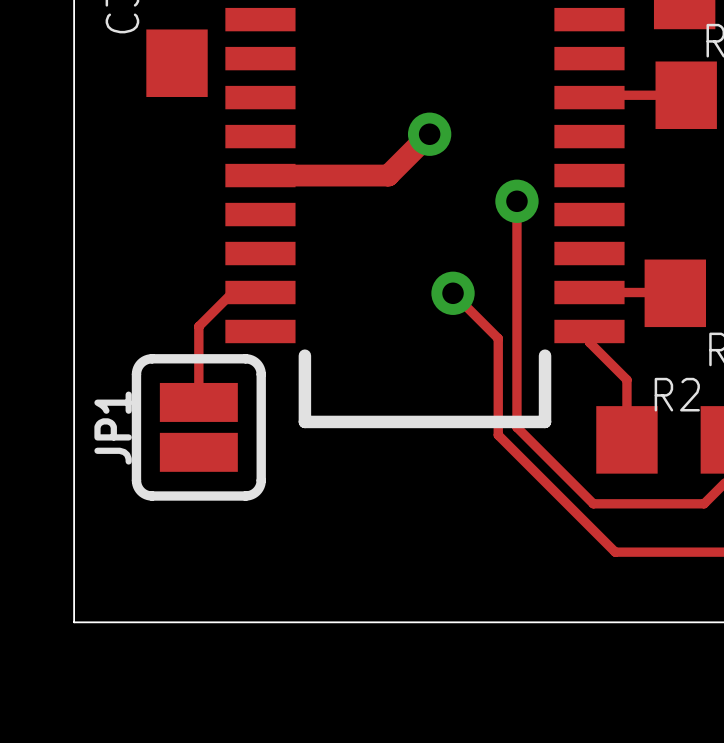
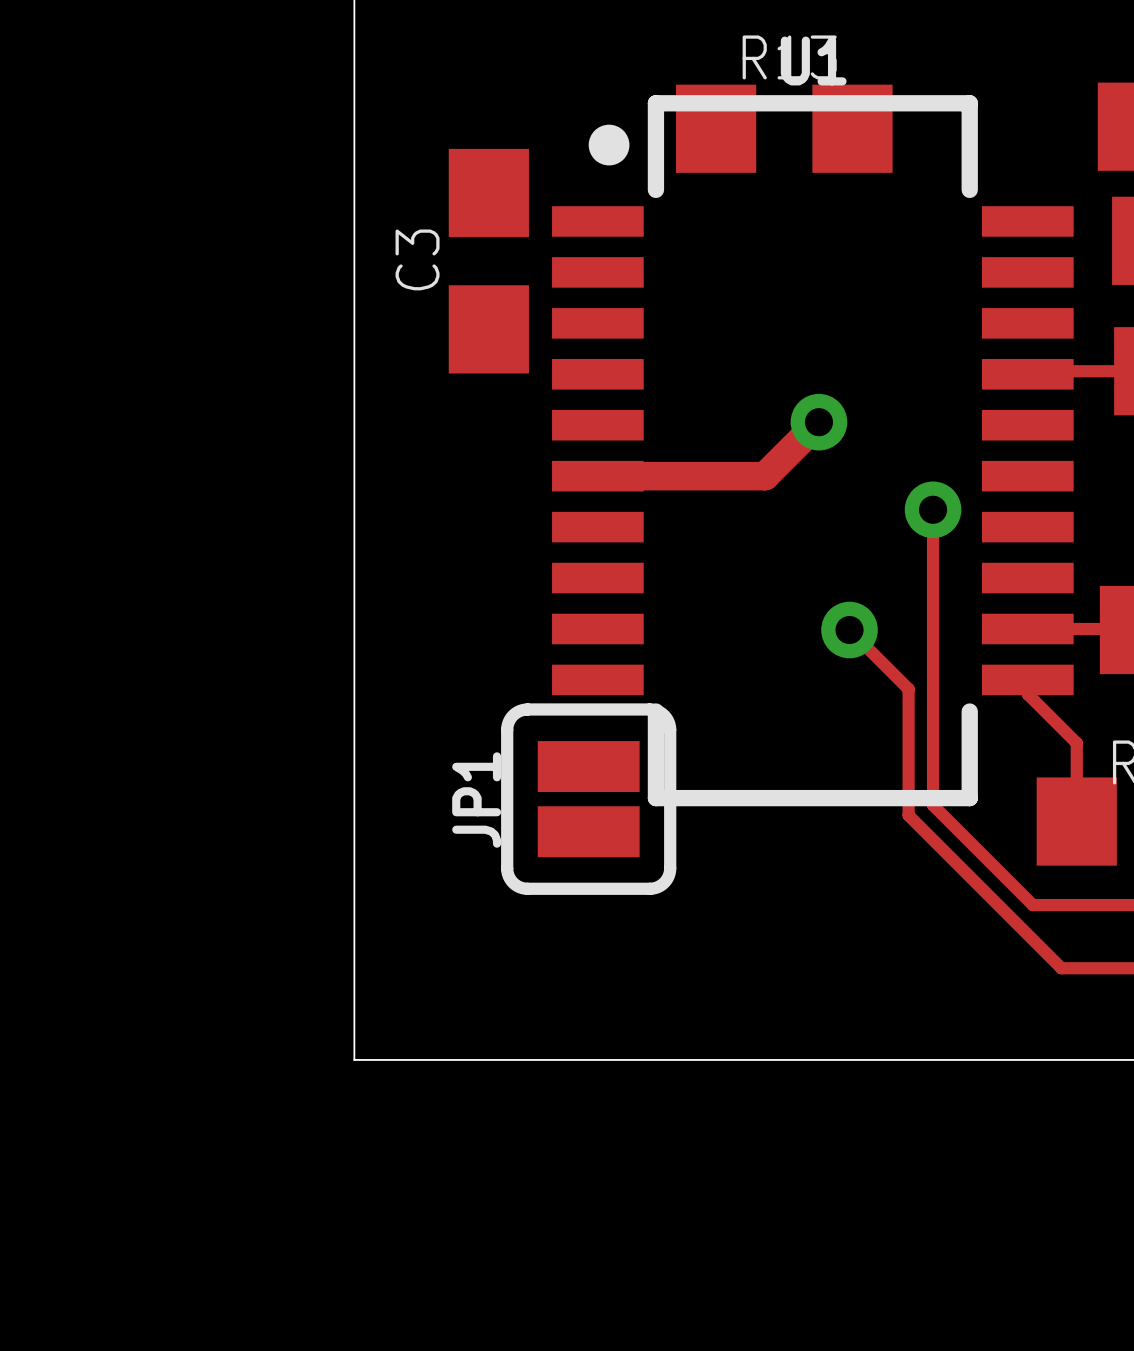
track: (259, 291) (233, 291) (198, 326) (198, 402) -> none
JP1 position: (198, 427) -> (588, 799)

